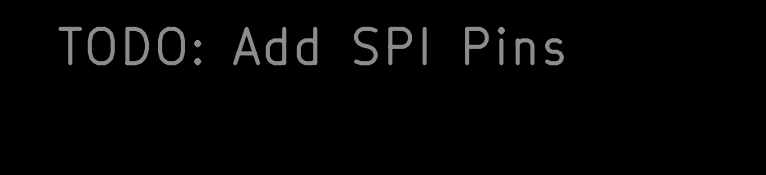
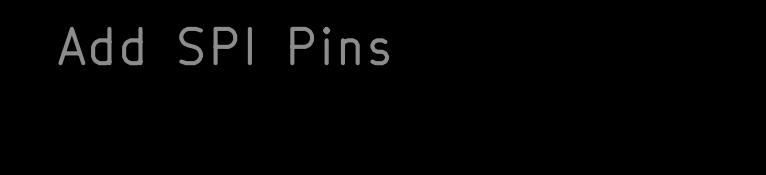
text: TODO: Add SPI Pins (311, 46) -> Add SPI Pins (223, 46)

